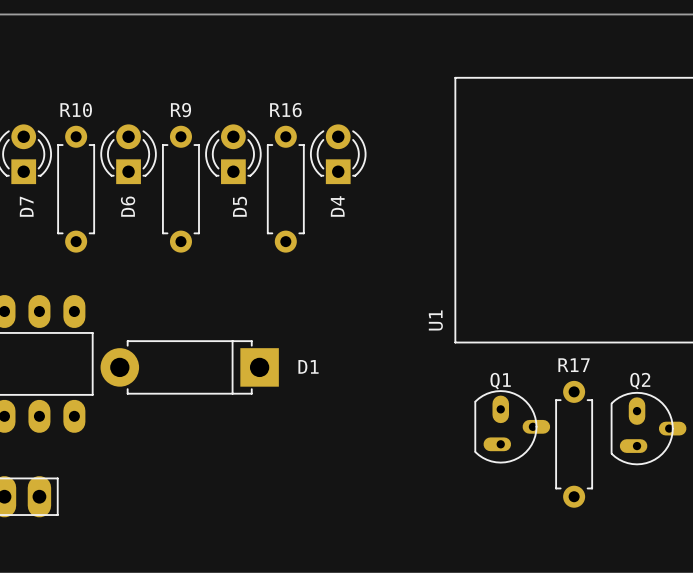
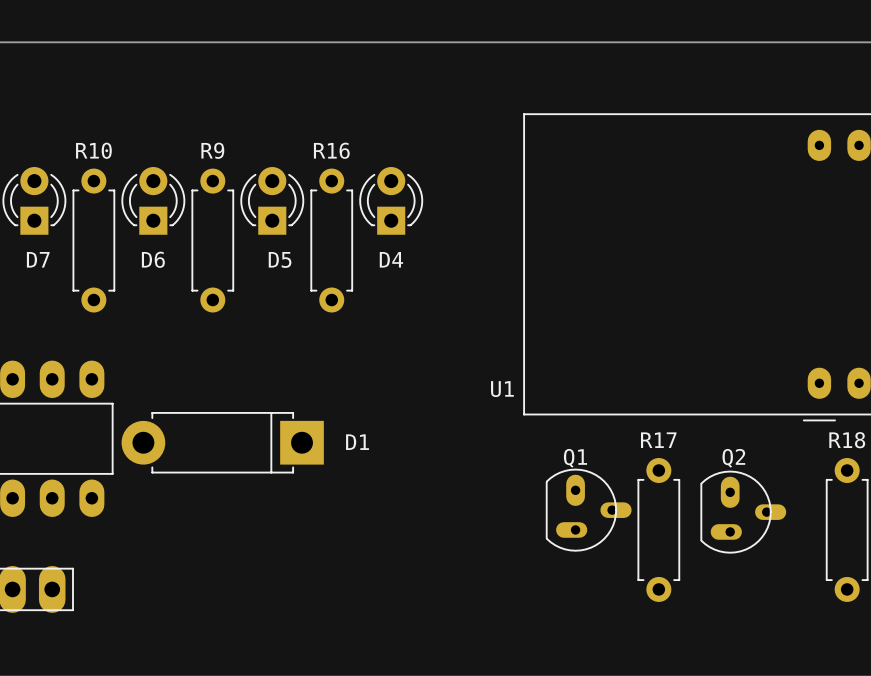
D7 name rotation: 0° (26, 206) -> 90° clockwise (38, 259)
D6 name rotation: 0° (128, 206) -> 90° clockwise (153, 259)
D5 name rotation: 0° (240, 206) -> 90° clockwise (280, 259)
D4 name rotation: 0° (337, 206) -> 90° clockwise (391, 259)
U1 name rotation: 0° (435, 320) -> 90° clockwise (502, 389)

